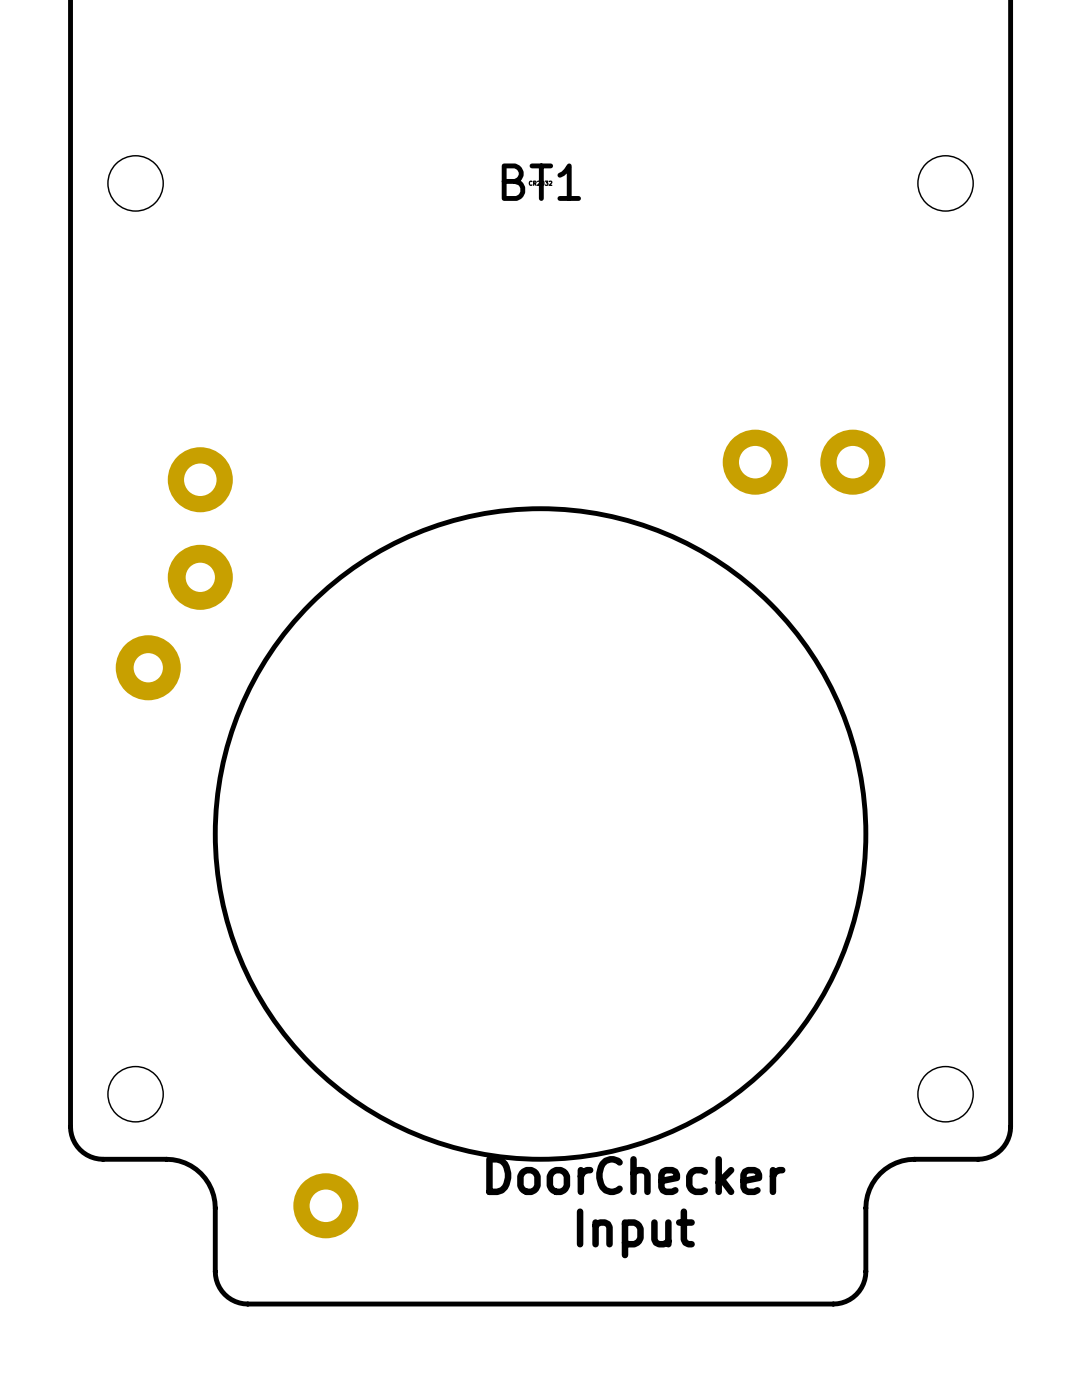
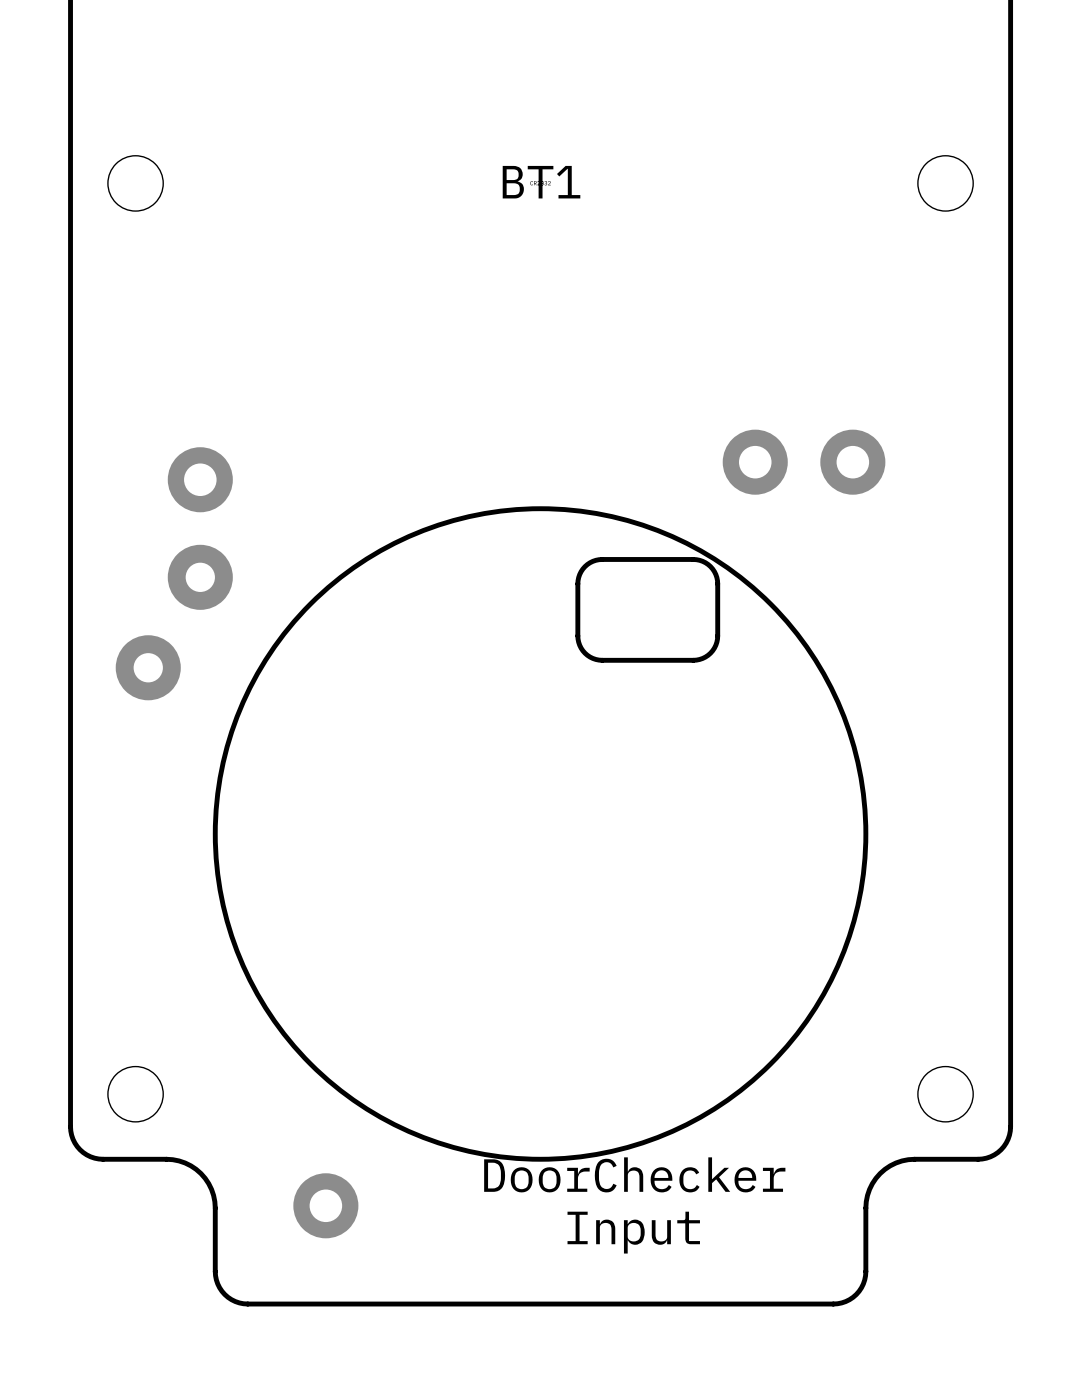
part: none -> (647, 609)

